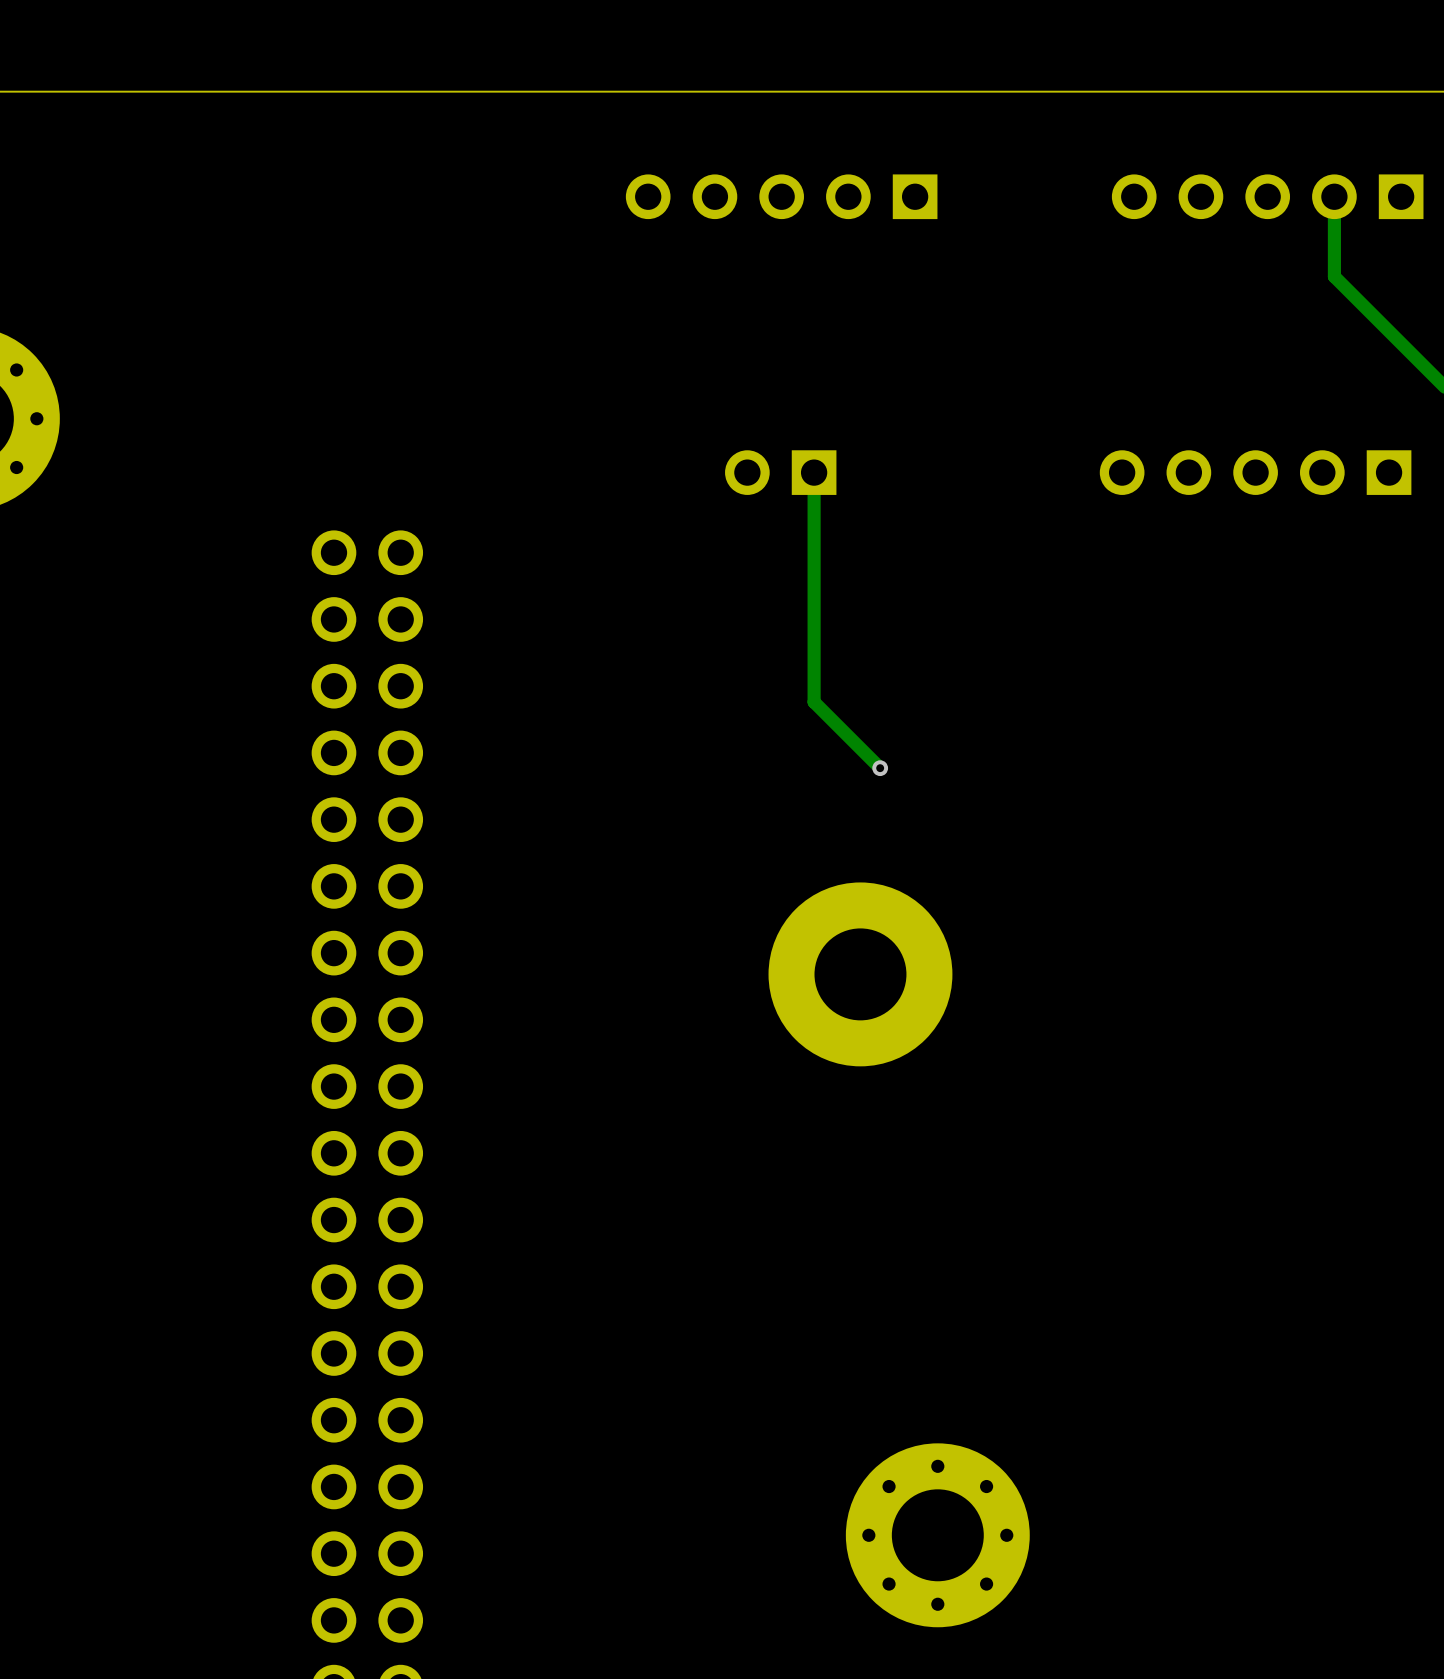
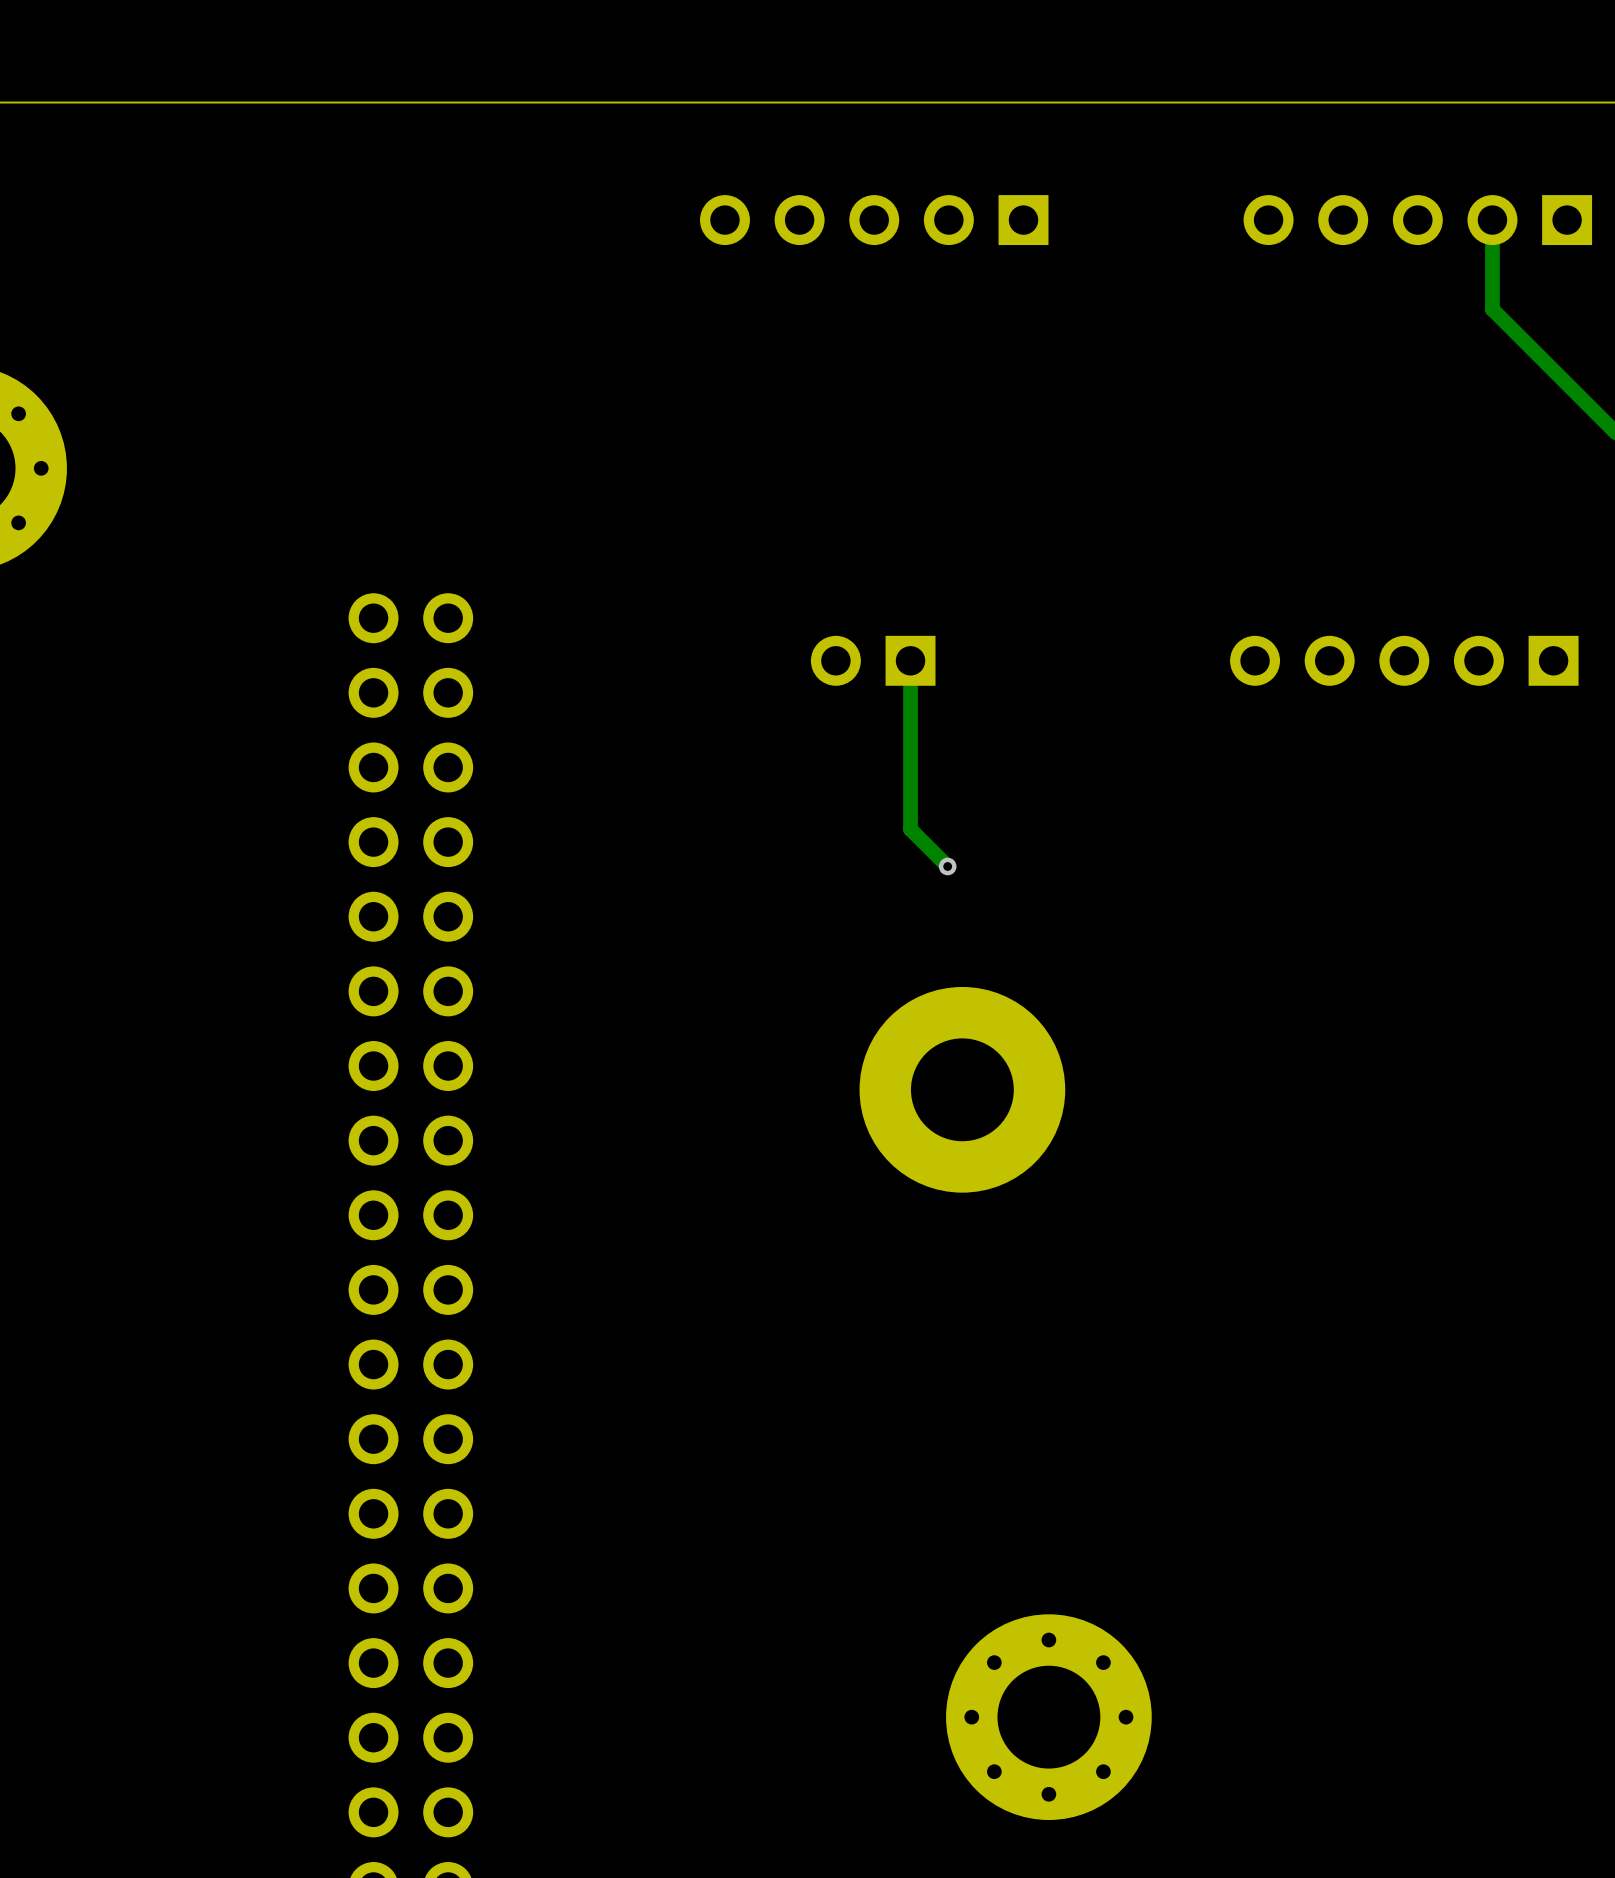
part position: (780, 472) -> (873, 660)
track: (814, 472) (814, 590) -> none
part position: (1255, 472) -> (1404, 660)
track: (814, 702) (880, 768) -> (910, 785) (910, 829) (947, 866)
via position: (880, 768) -> (947, 866)

